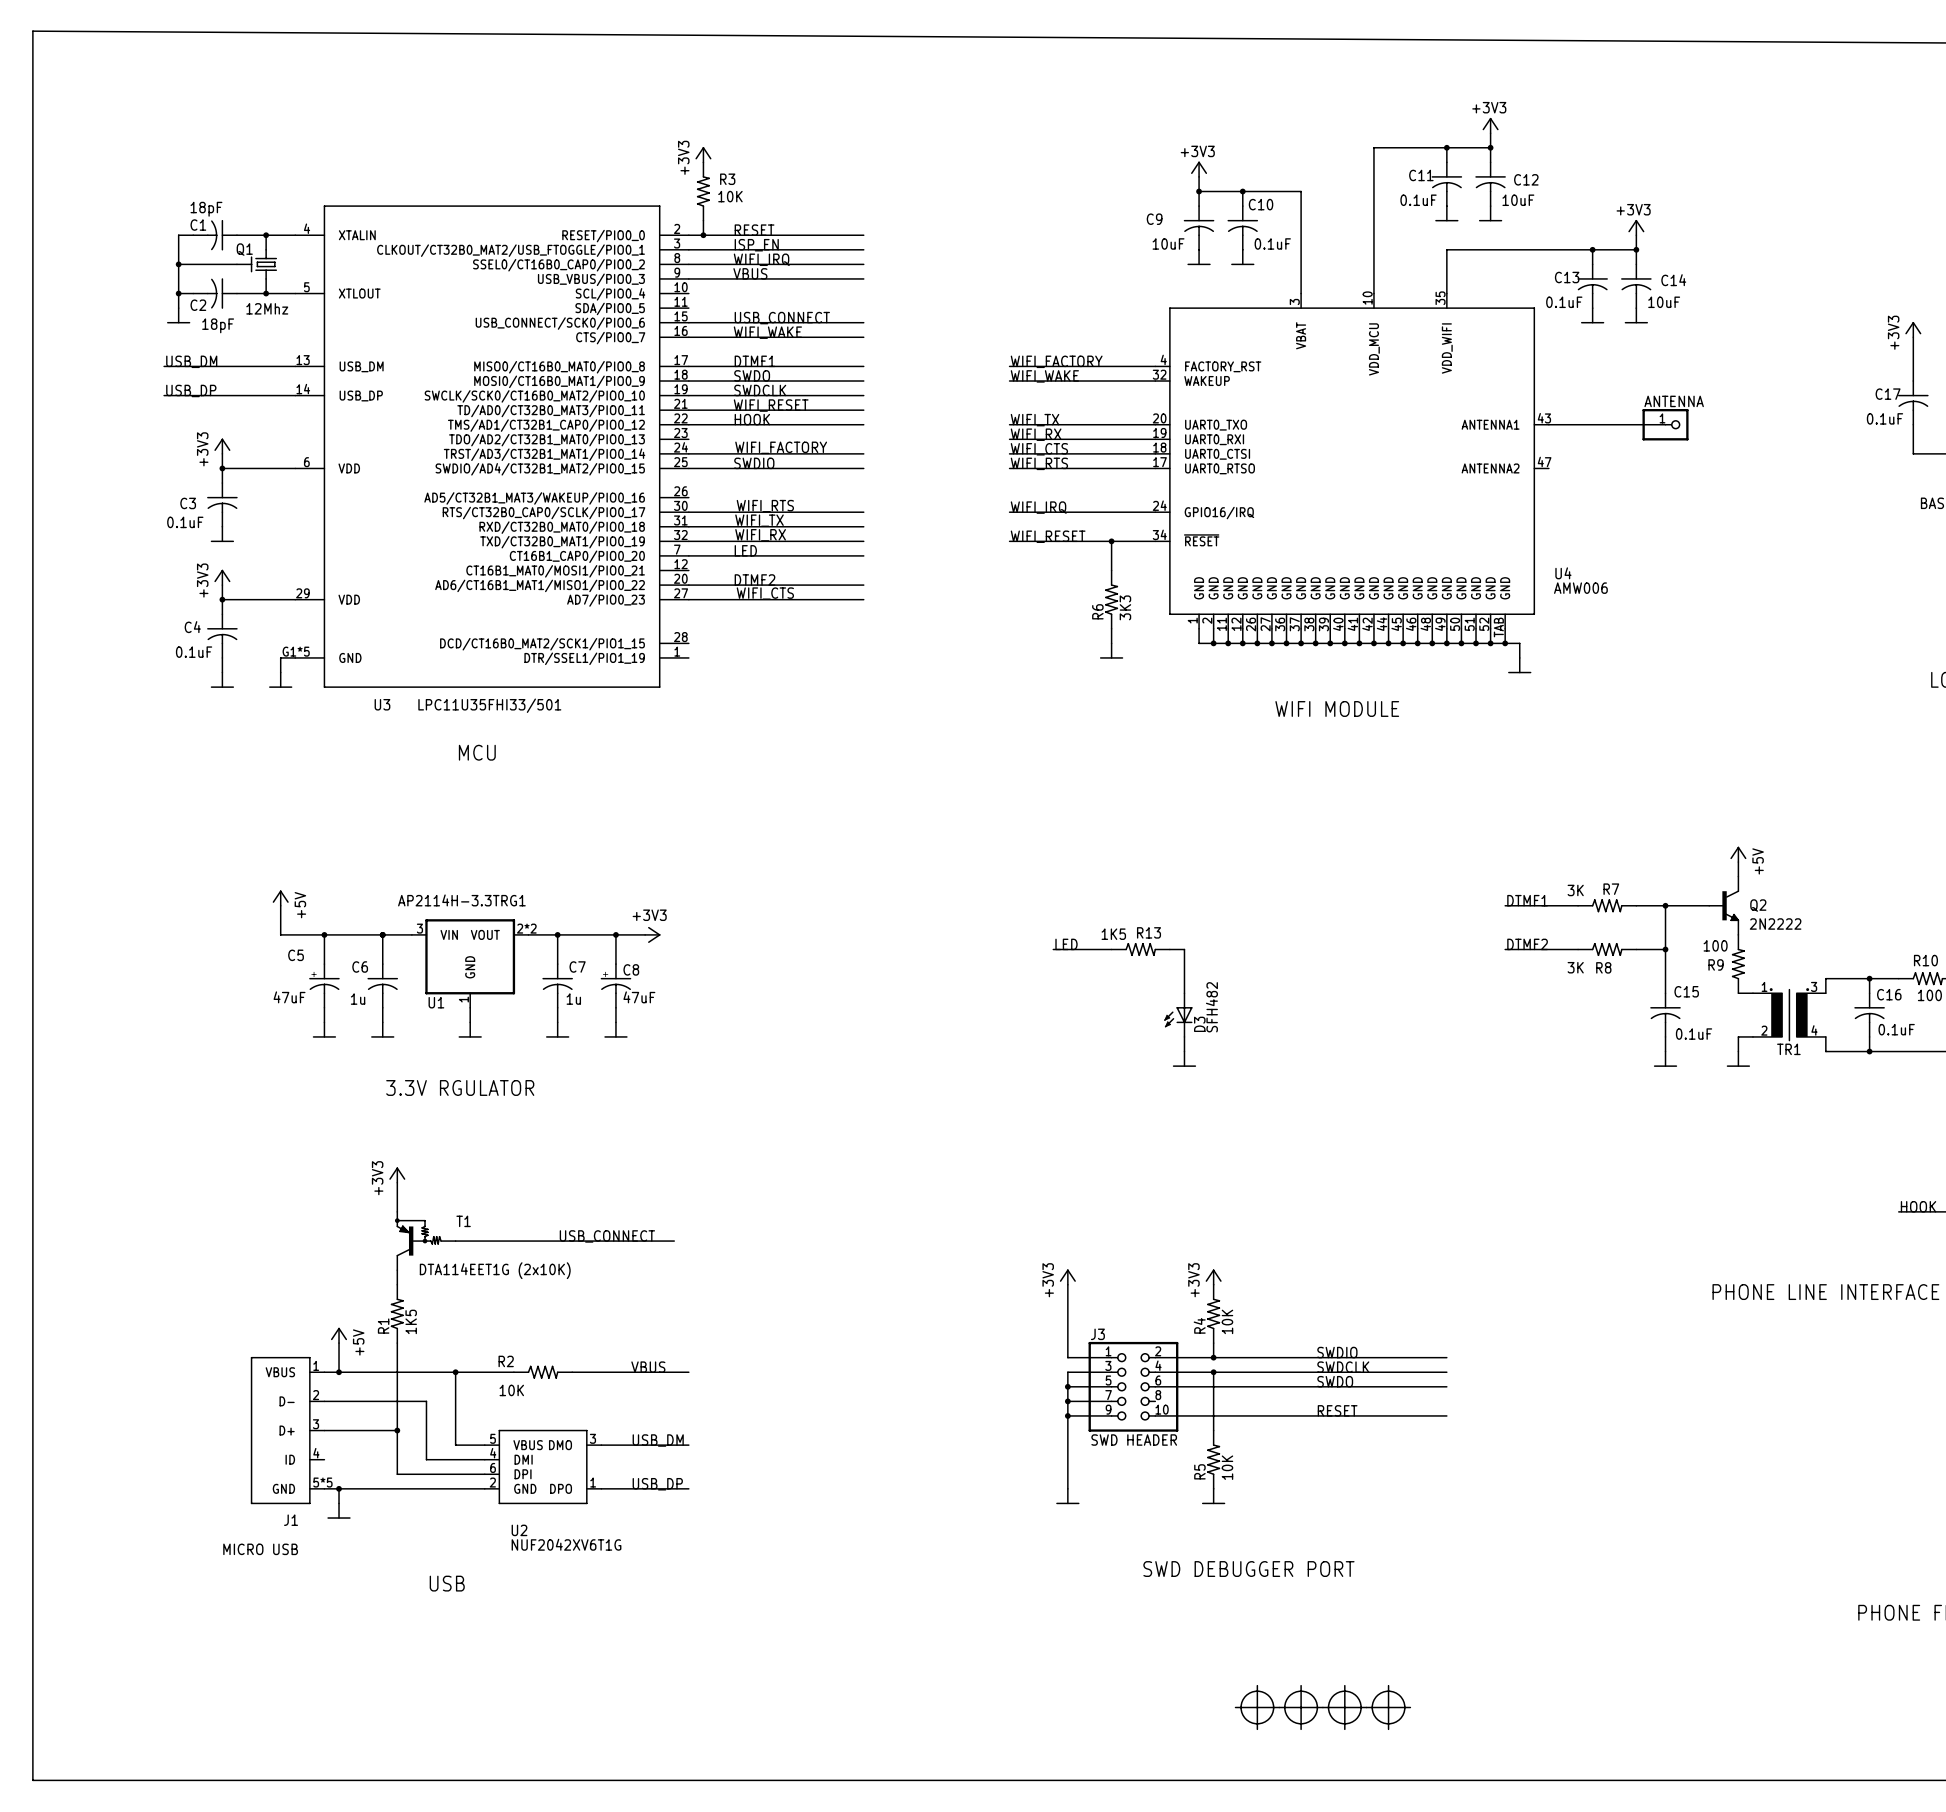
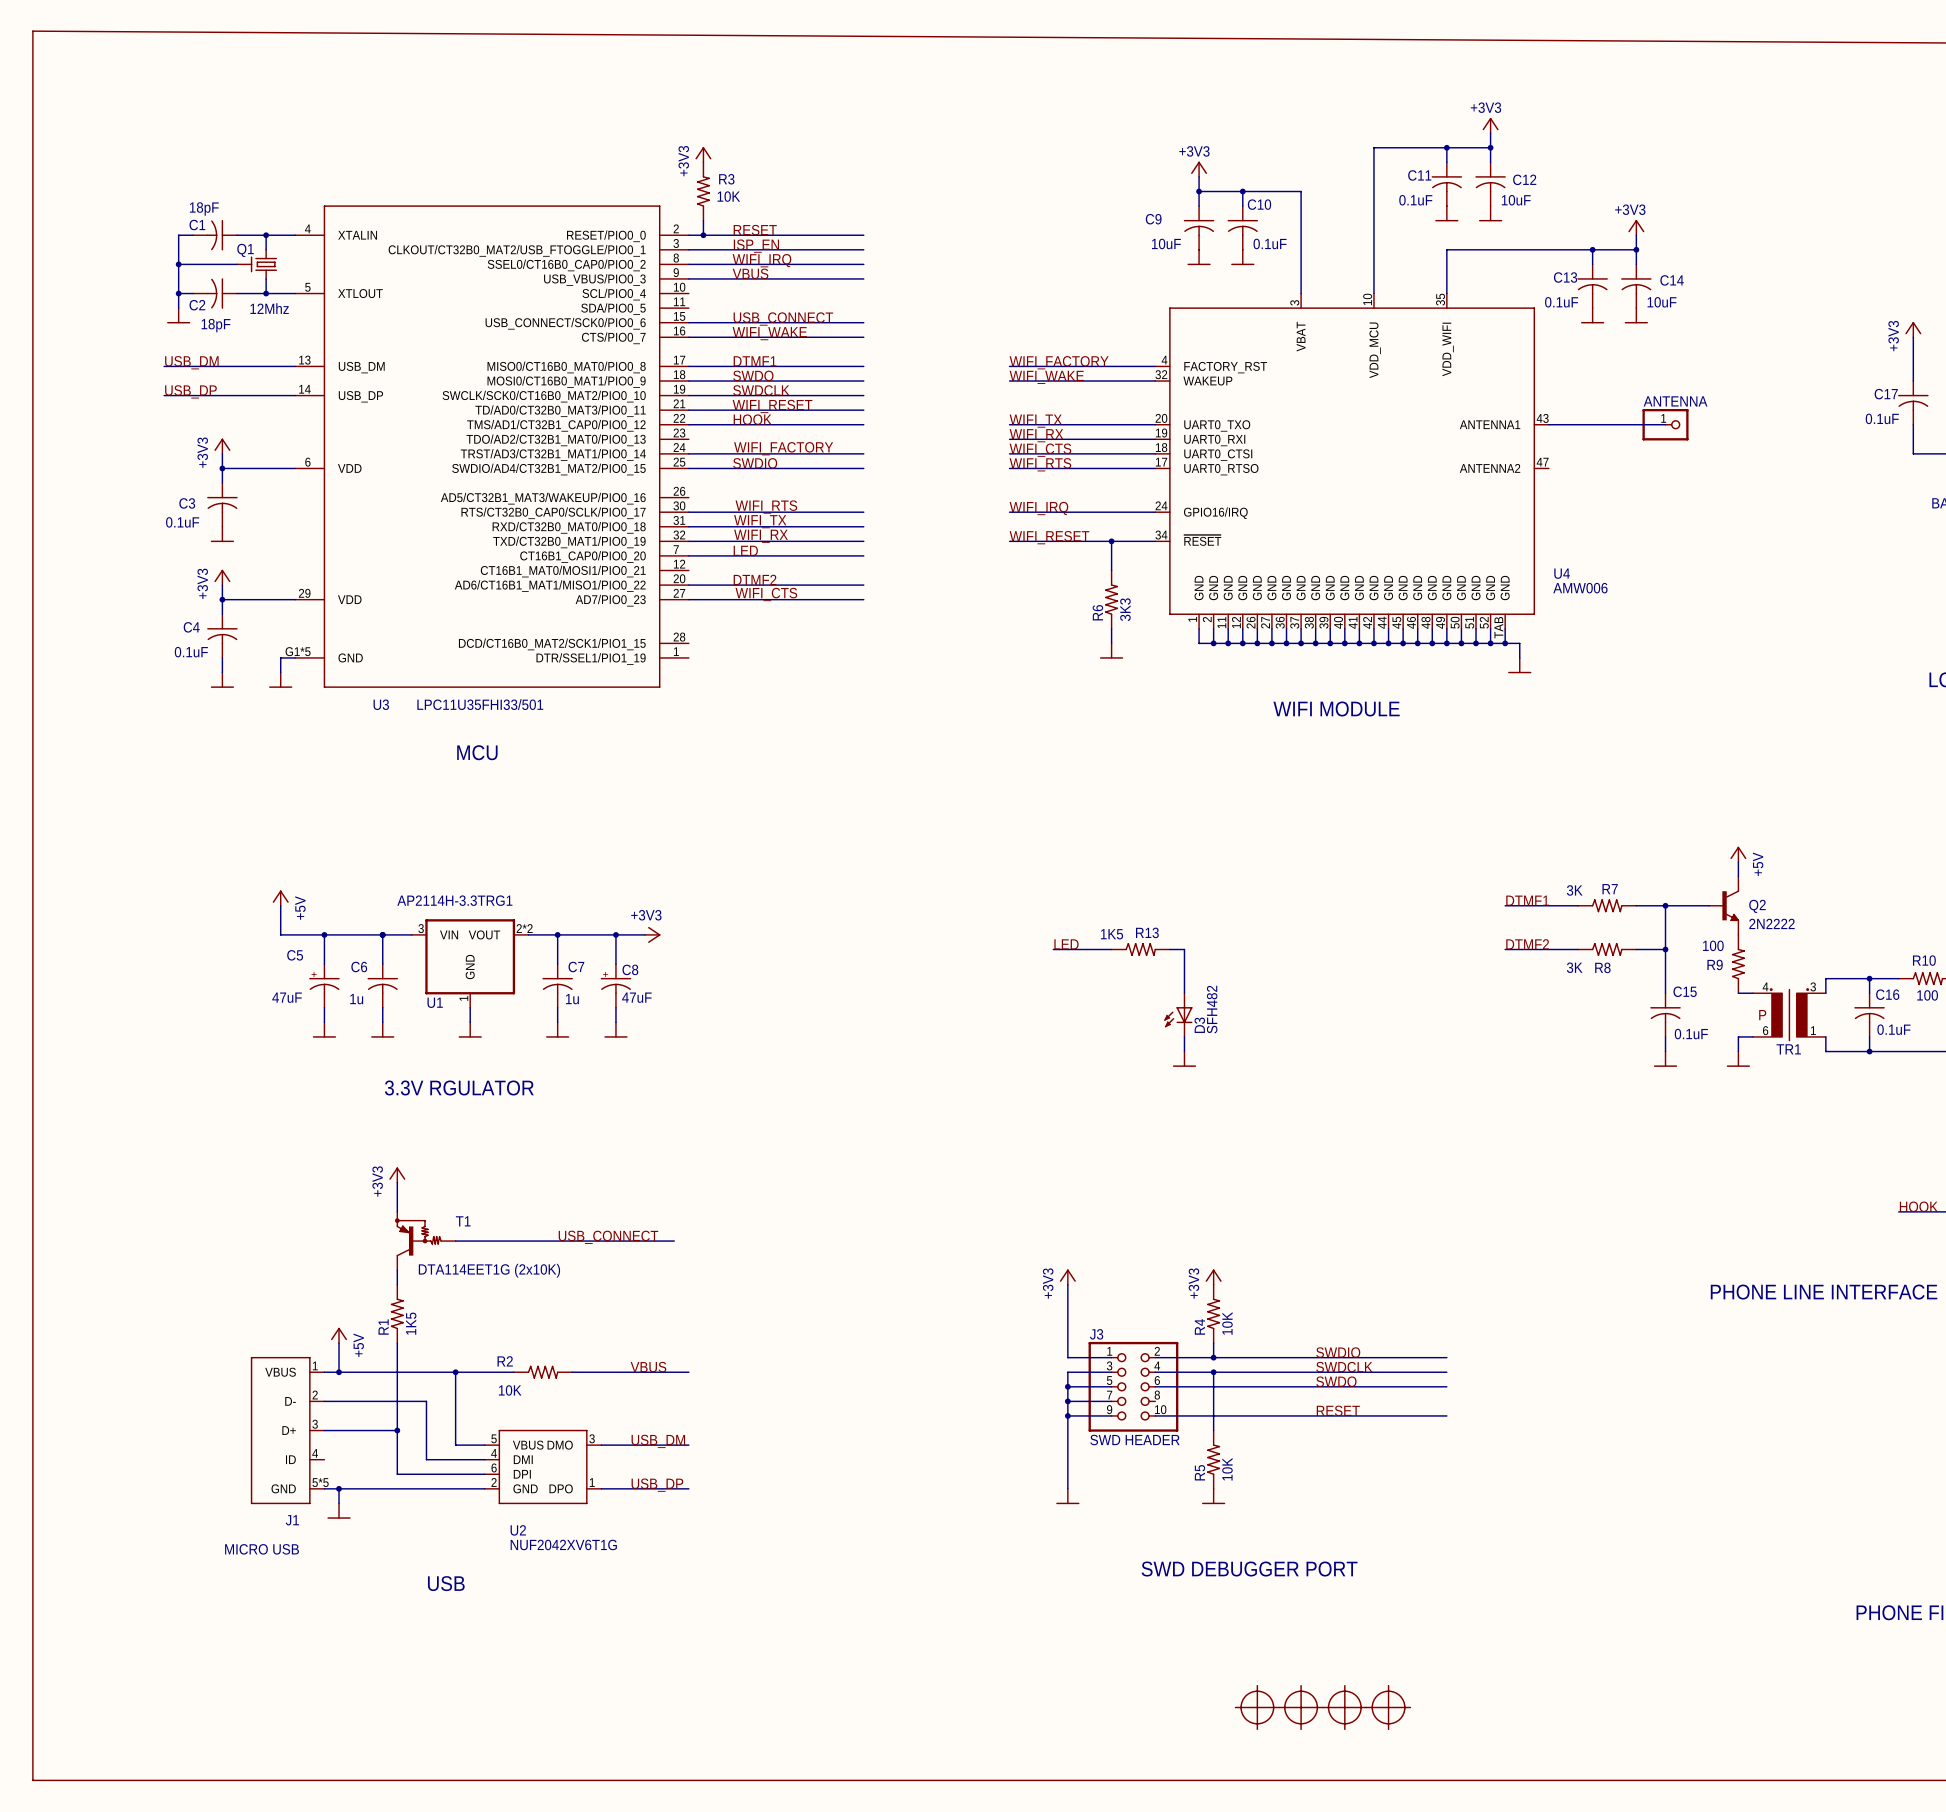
TR1 pin number: 1 (1764, 986) -> 4 (1765, 986)
TR1 text: none -> P (1762, 1015)
TR1 pin number: 2 (1764, 1030) -> 6 (1765, 1030)
TR1 pin number: 4 (1814, 1030) -> 1 (1813, 1030)

